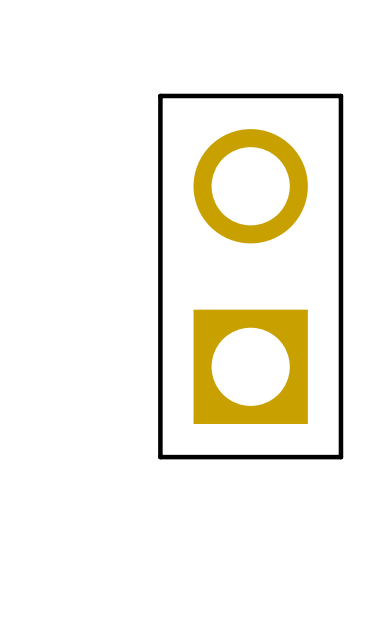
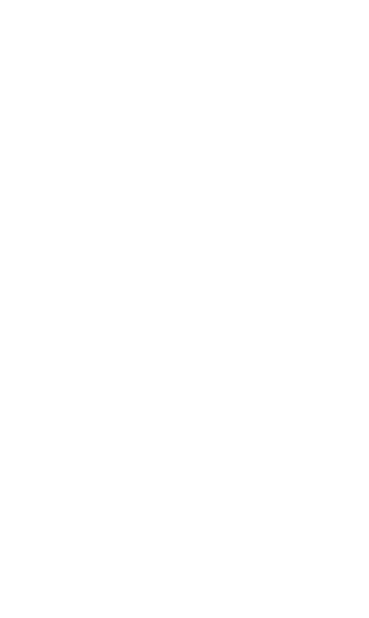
part: (250, 276) -> none

